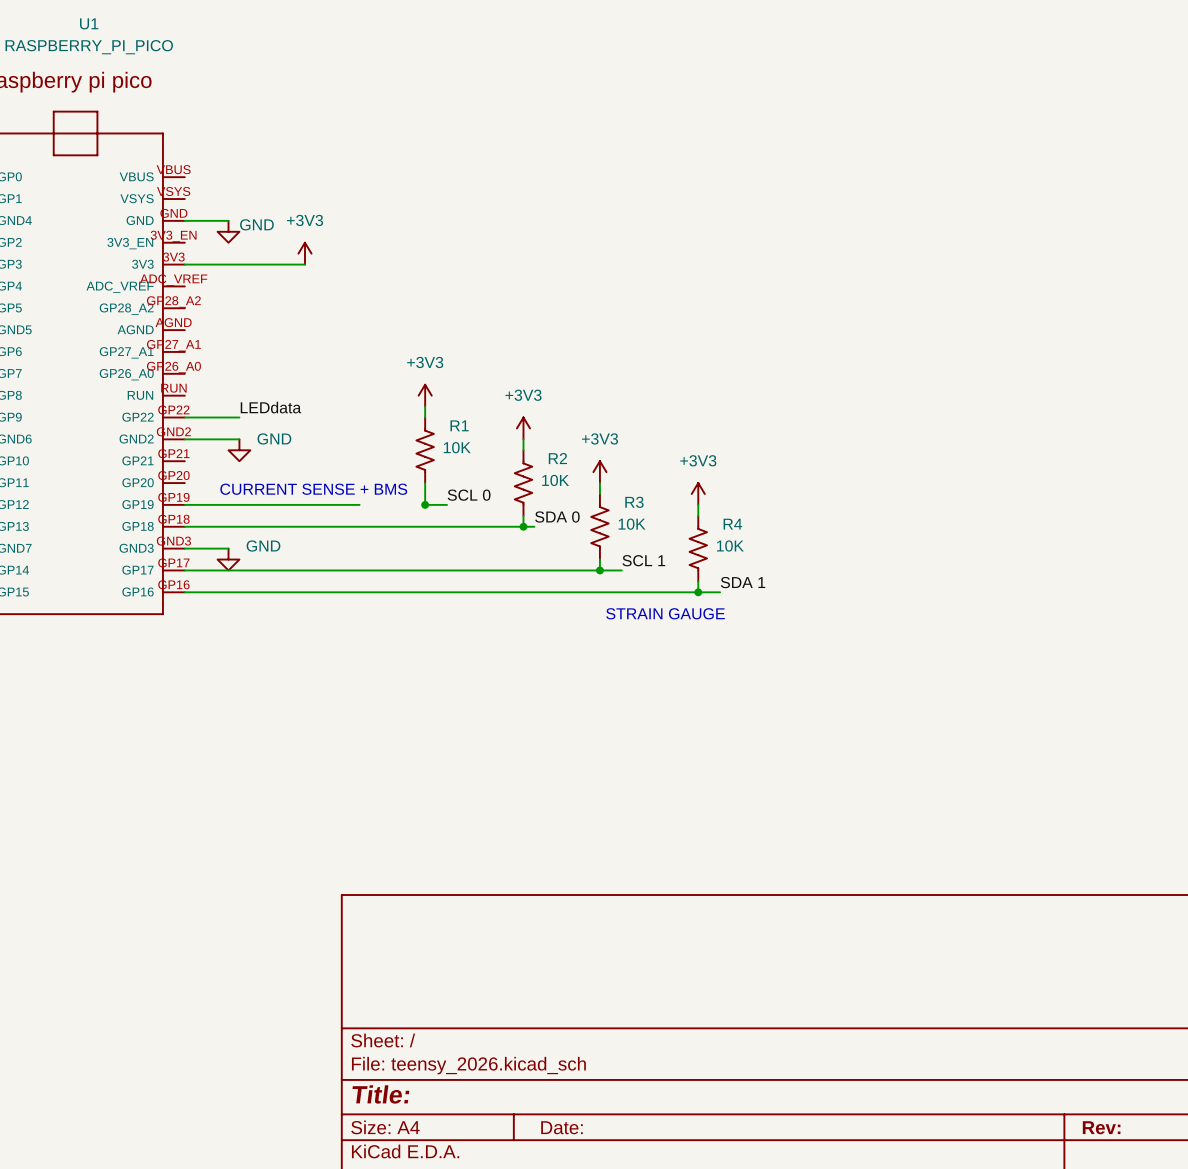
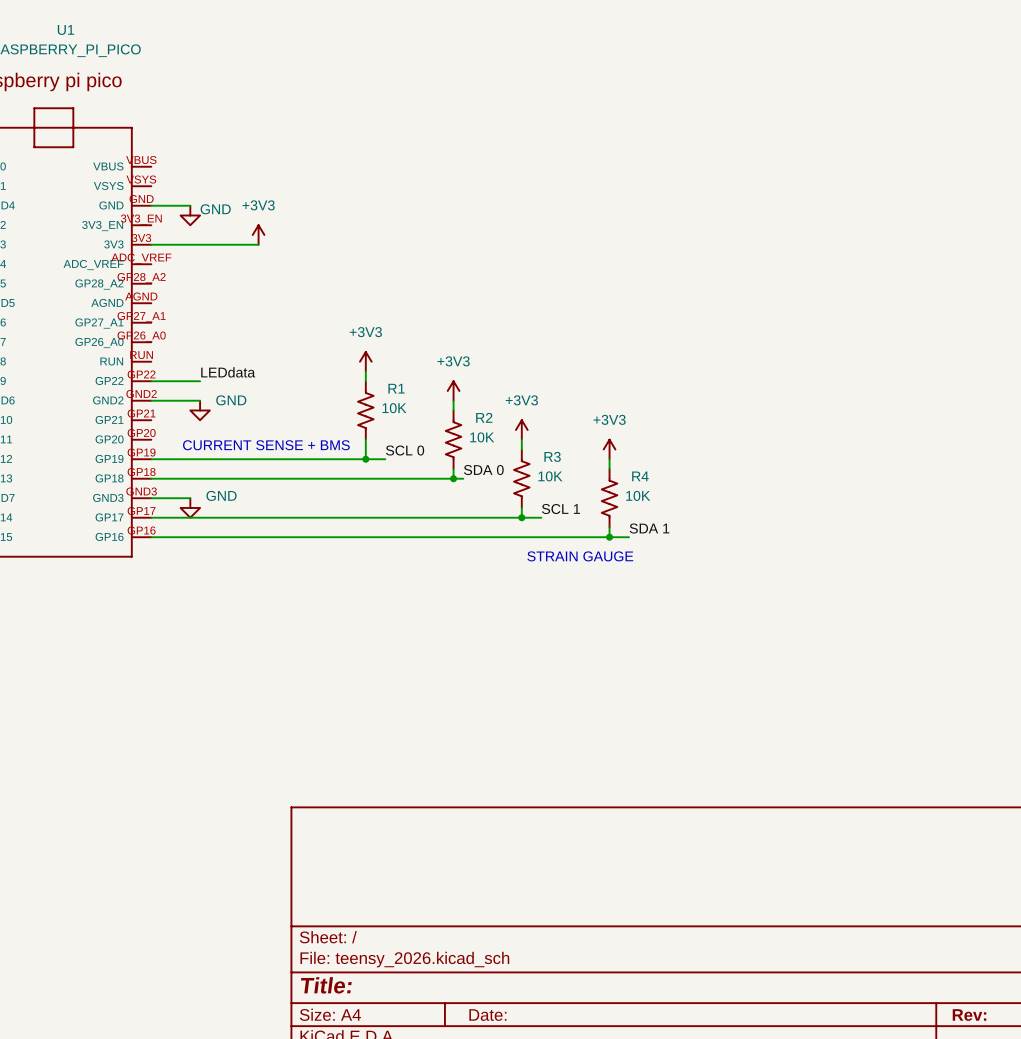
wire: none -> (307, 459) (365, 459)

